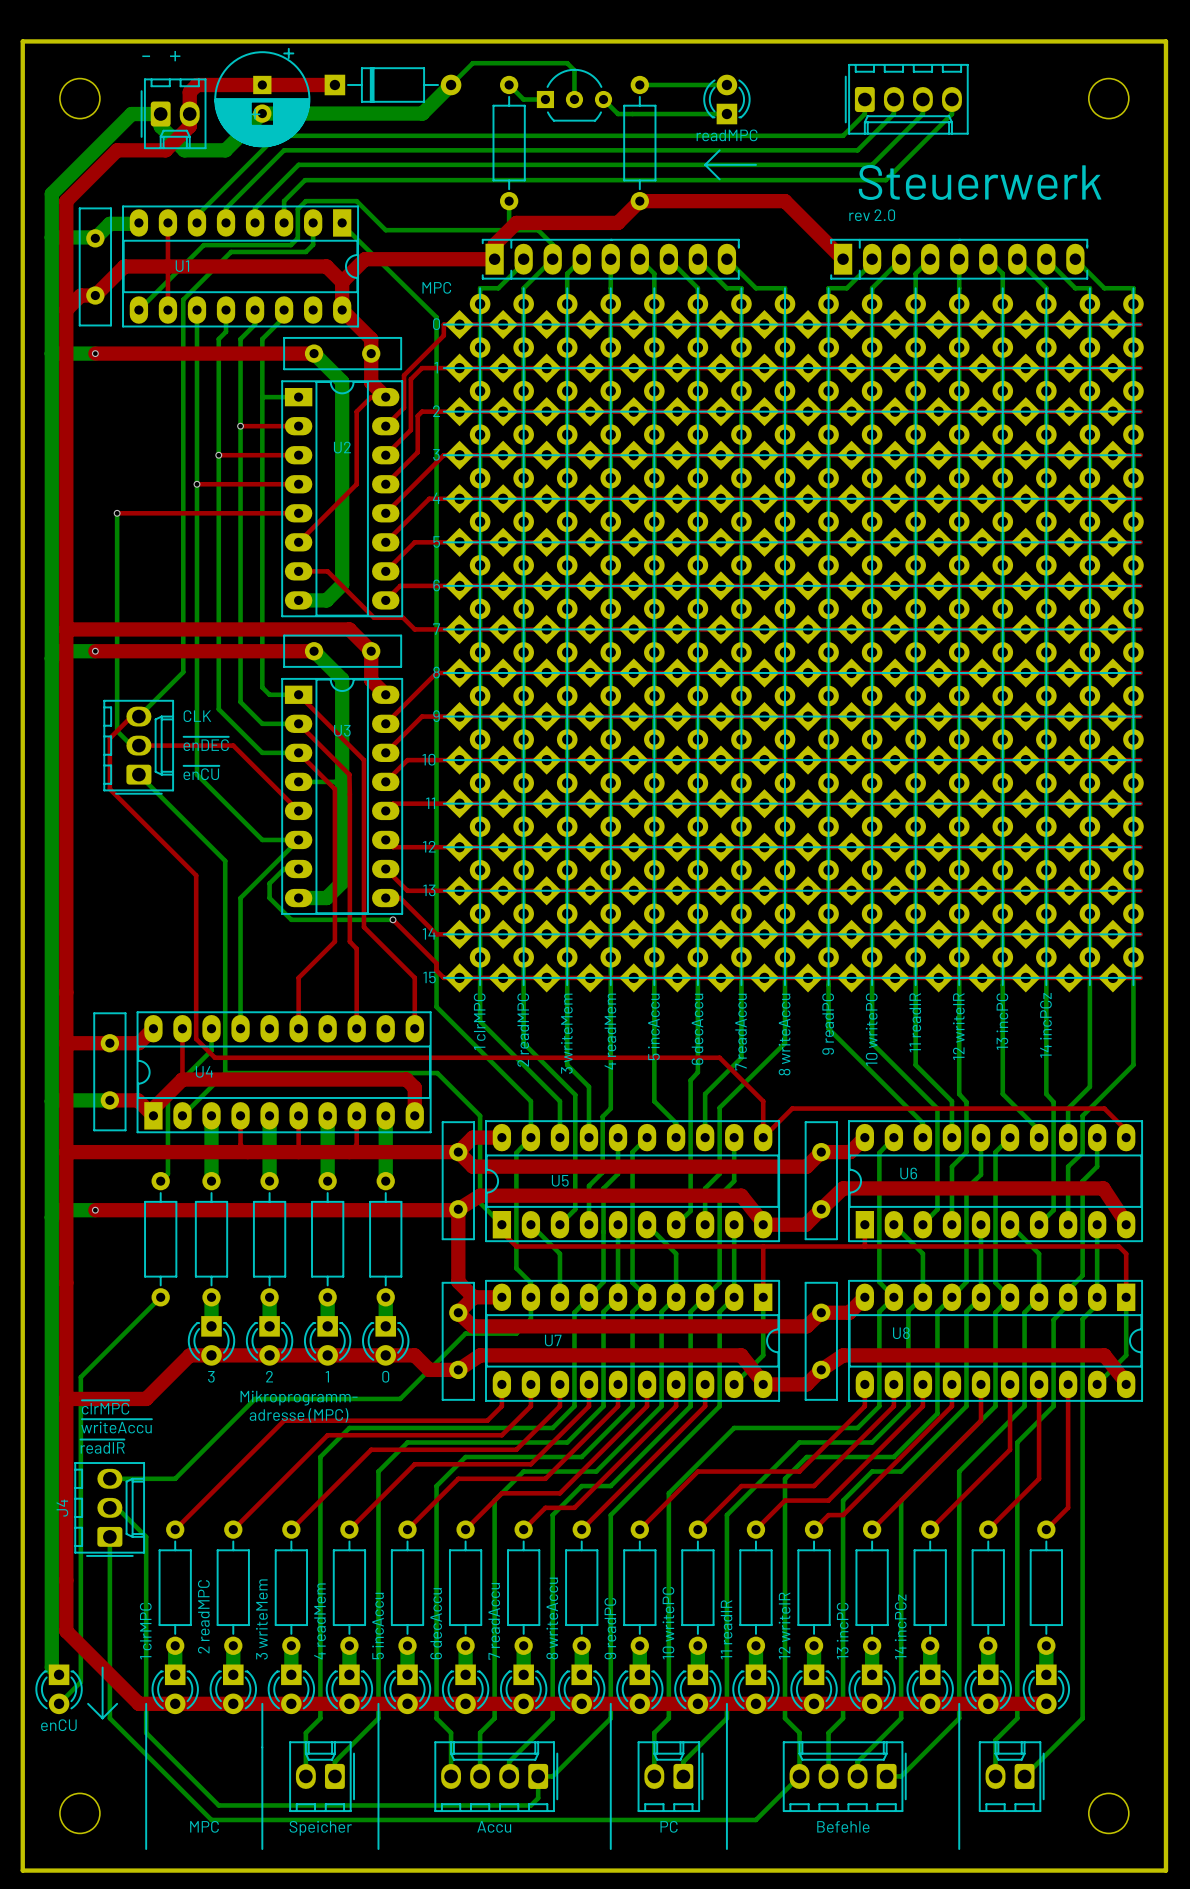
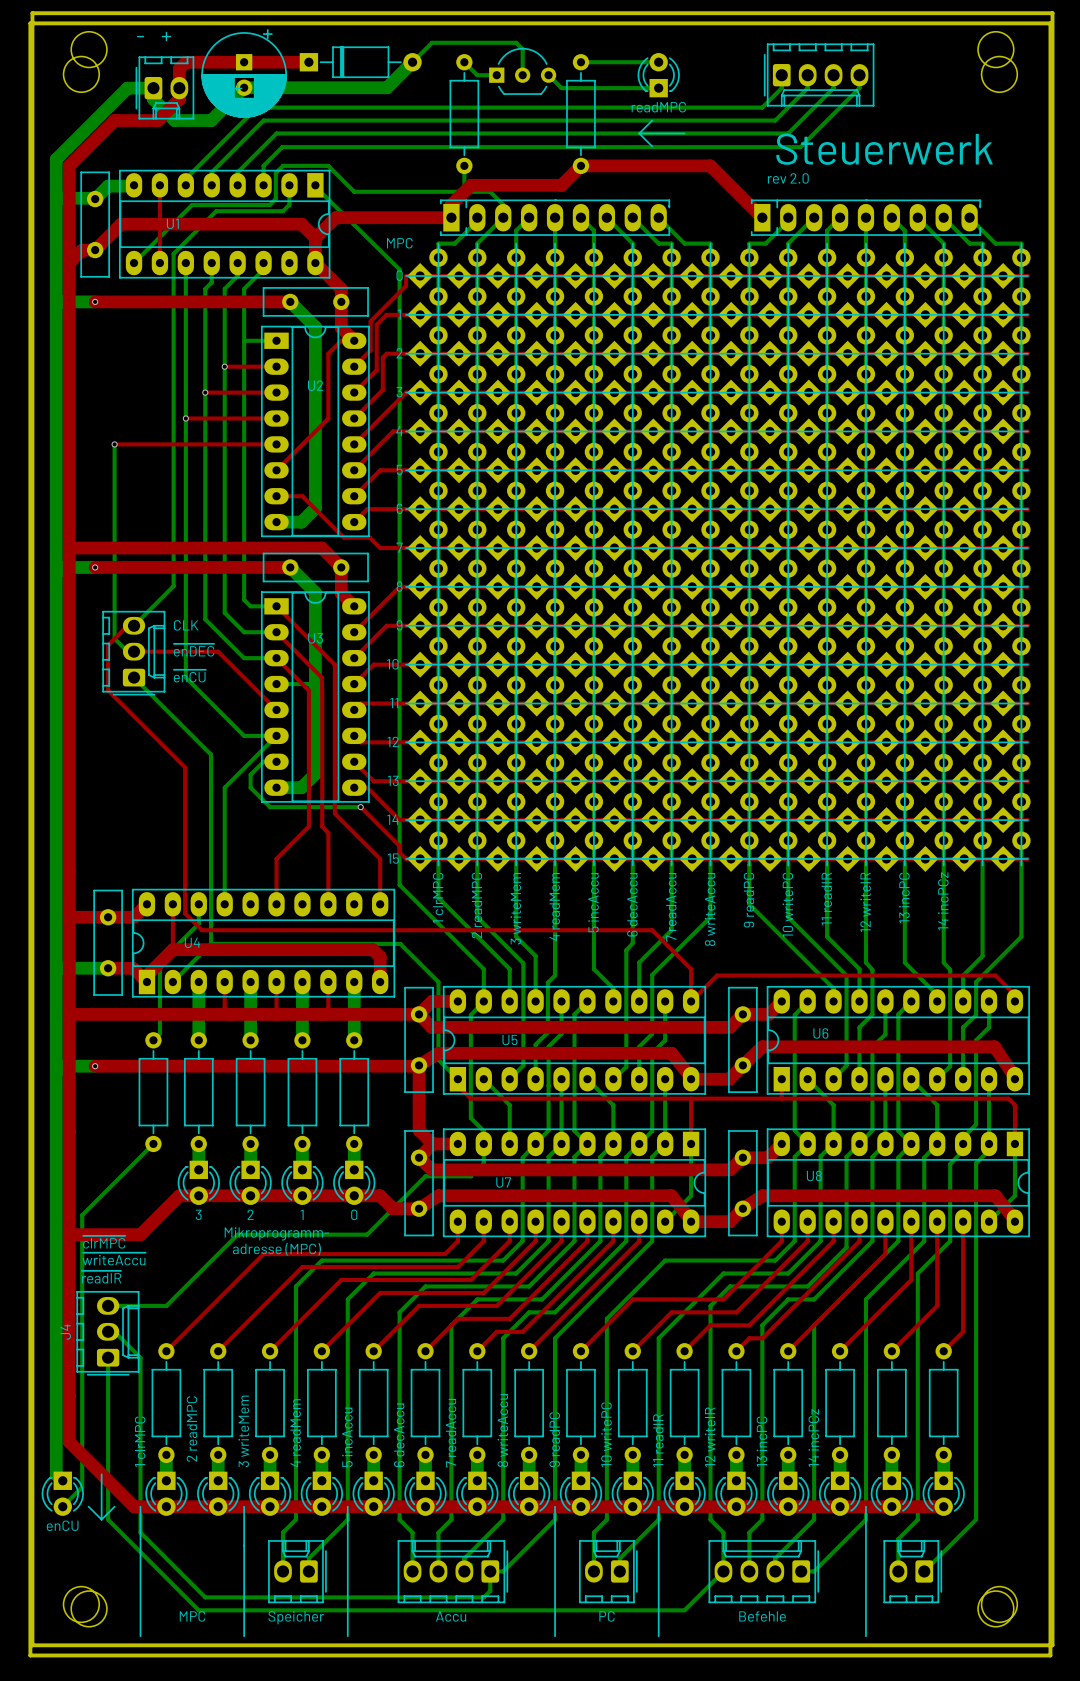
part: none -> (542, 829)

